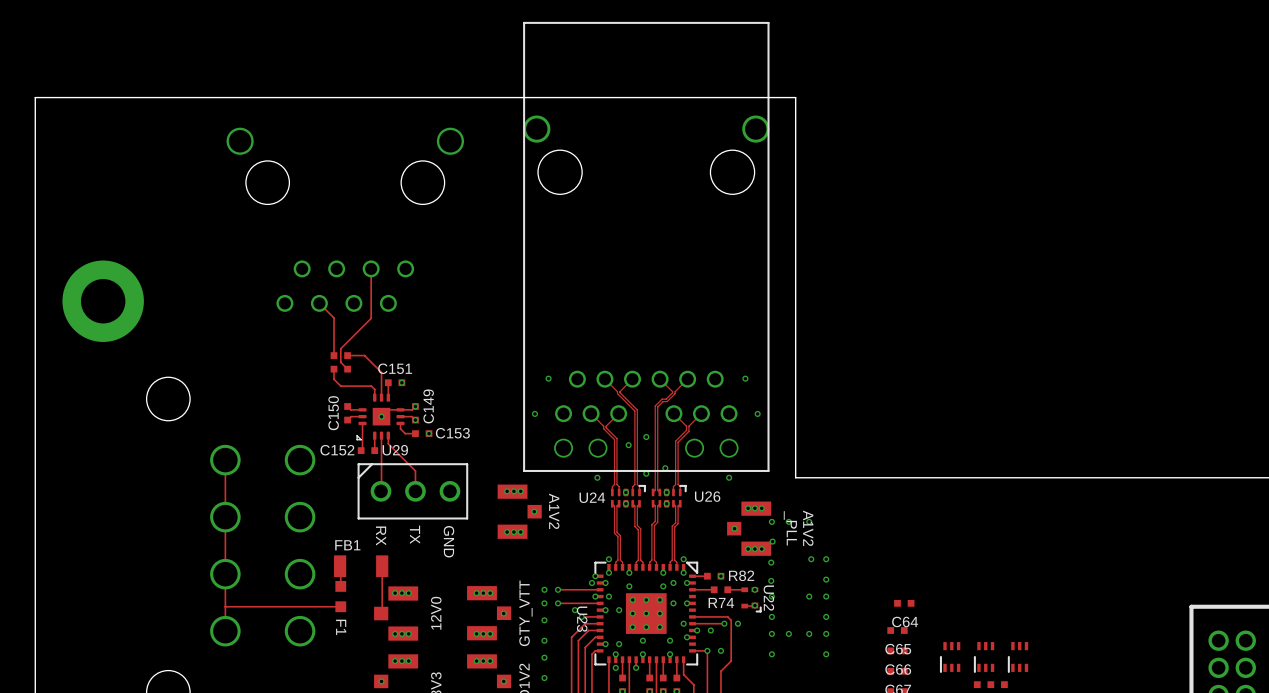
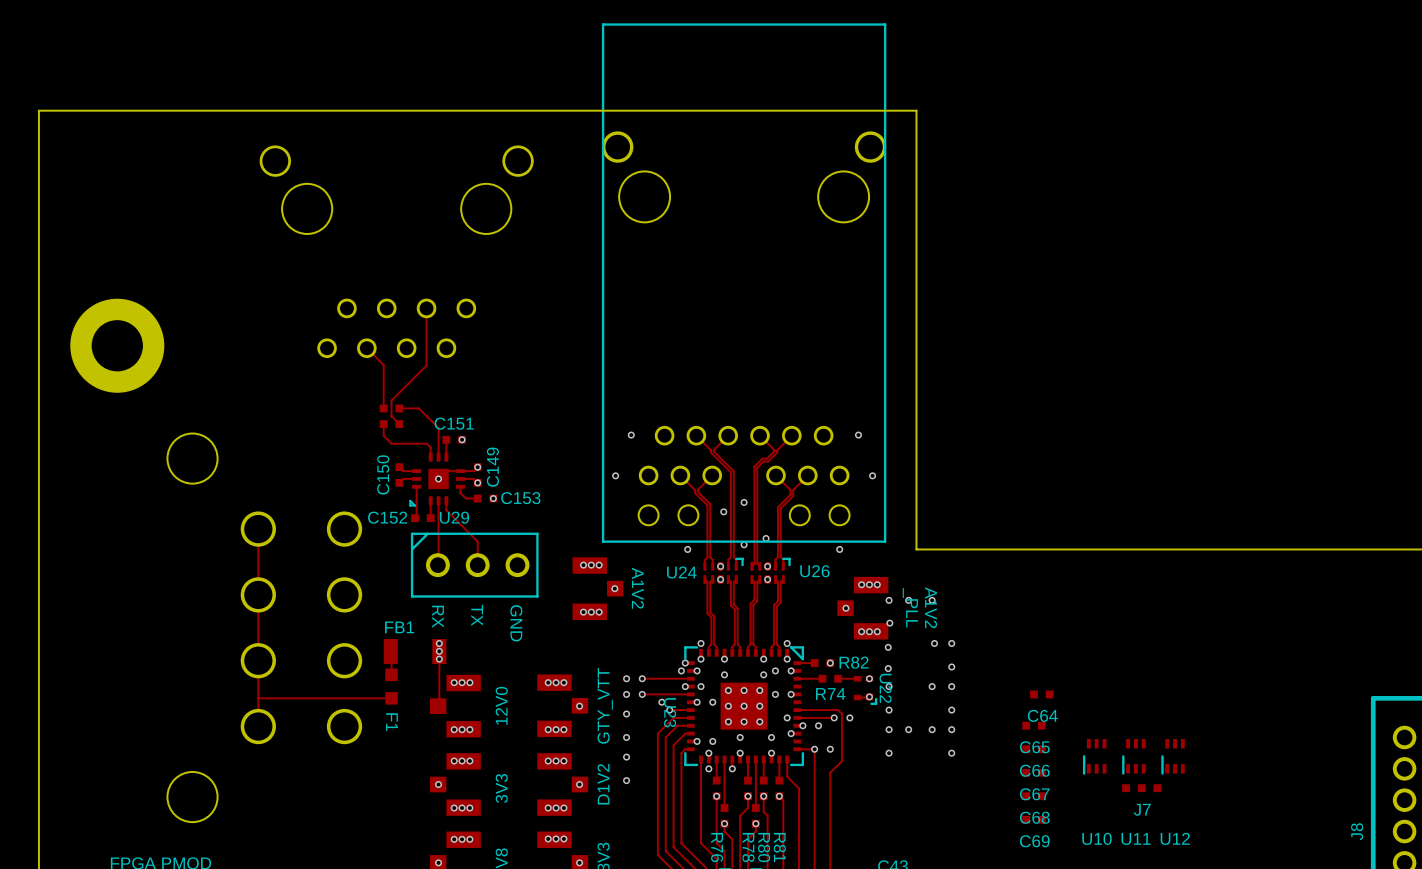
via: none -> (439, 643)
via: none -> (439, 651)
via: none -> (439, 659)

